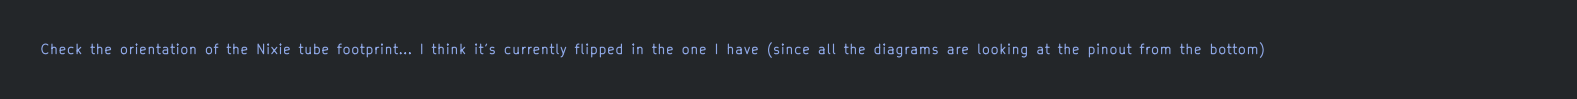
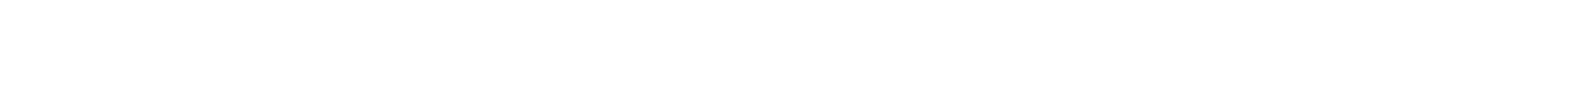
text: Check the orientation of the Nixie tube footprint... I think it's currently flipped in the one I have (since all the diagrams are looking at the pinout from the bottom) (652, 50) -> none

